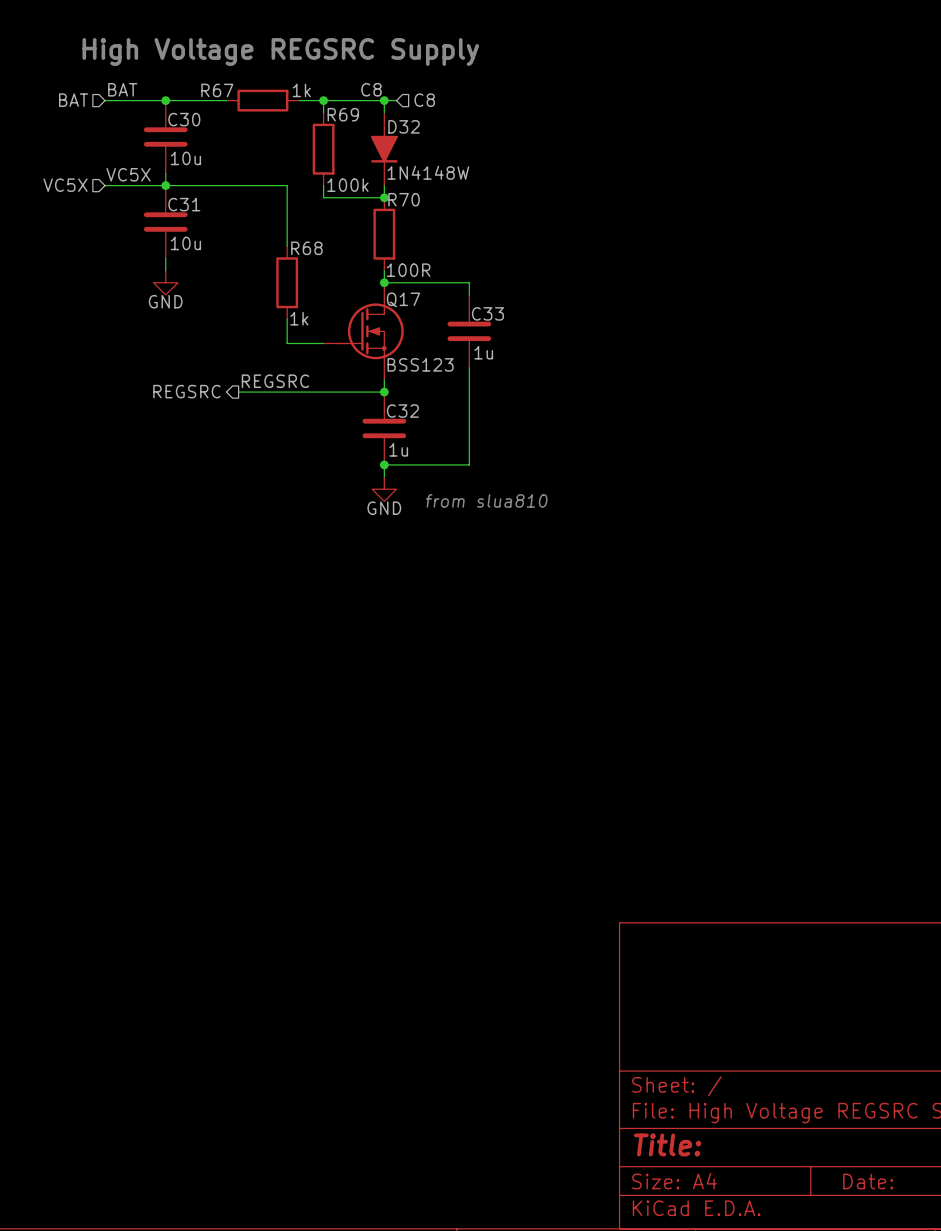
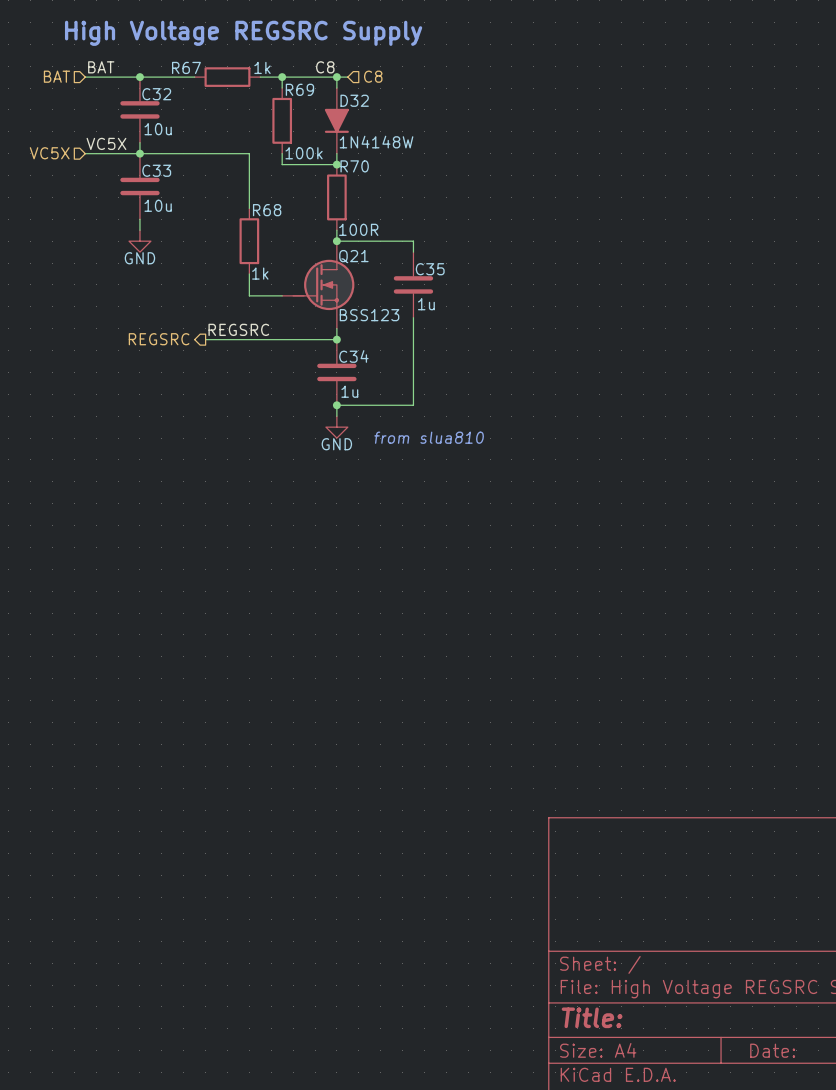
C30 name: C30 (184, 119) -> C32 (156, 94)
C31 name: C31 (184, 204) -> C33 (156, 170)
Q17 name: Q17 (403, 299) -> Q21 (353, 256)
C33 name: C33 (487, 313) -> C35 (430, 269)
C32 name: C32 (402, 411) -> C34 (353, 356)

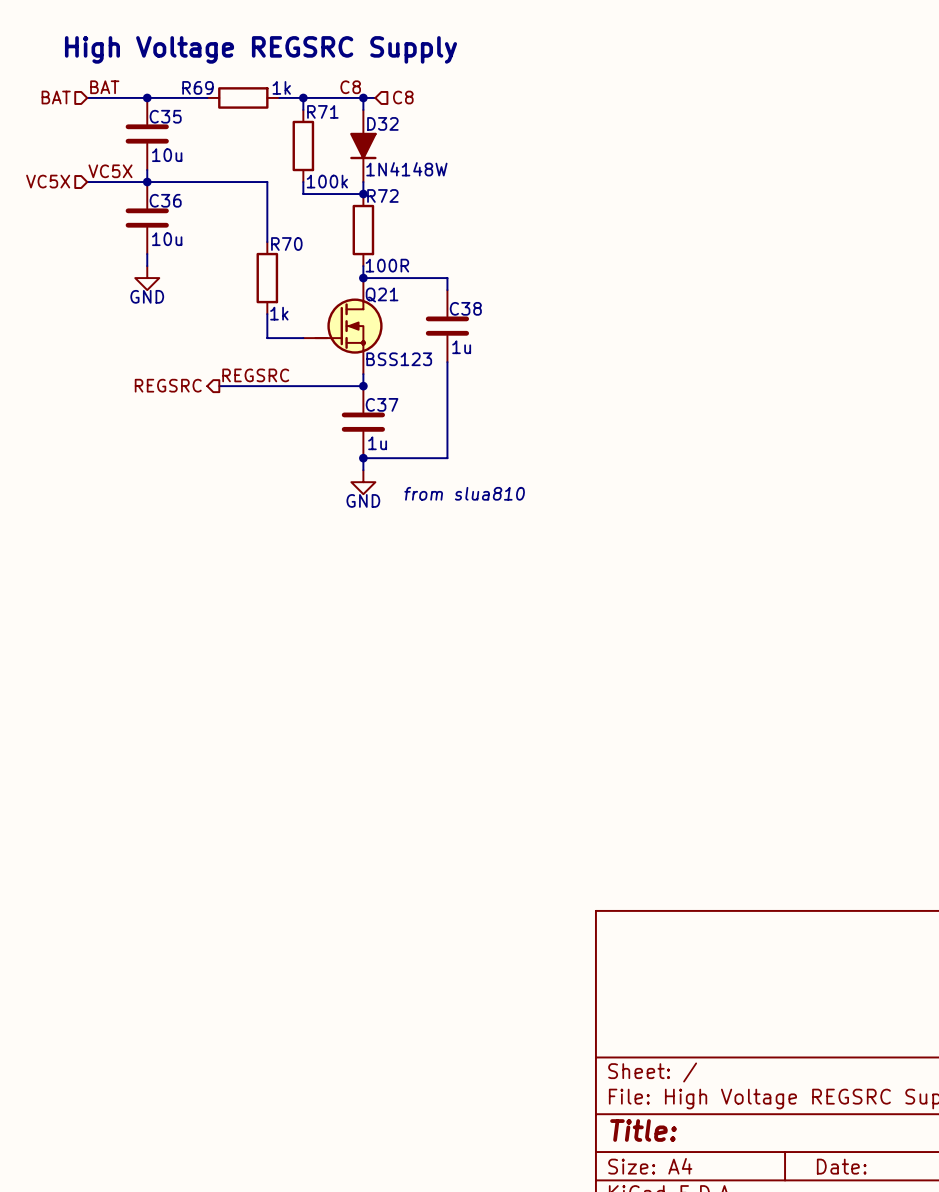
R67 name: R67 (186, 67) -> R69 (197, 87)
R69 name: R69 (299, 89) -> R71 (322, 111)
C32 name: C32 (156, 94) -> C35 (165, 116)
R70 name: R70 (354, 166) -> R72 (382, 195)
C33 name: C33 (156, 170) -> C36 (165, 200)
R68 name: R68 (267, 210) -> R70 (286, 244)
C35 name: C35 (430, 269) -> C38 (465, 308)
C34 name: C34 (353, 356) -> C37 (382, 404)

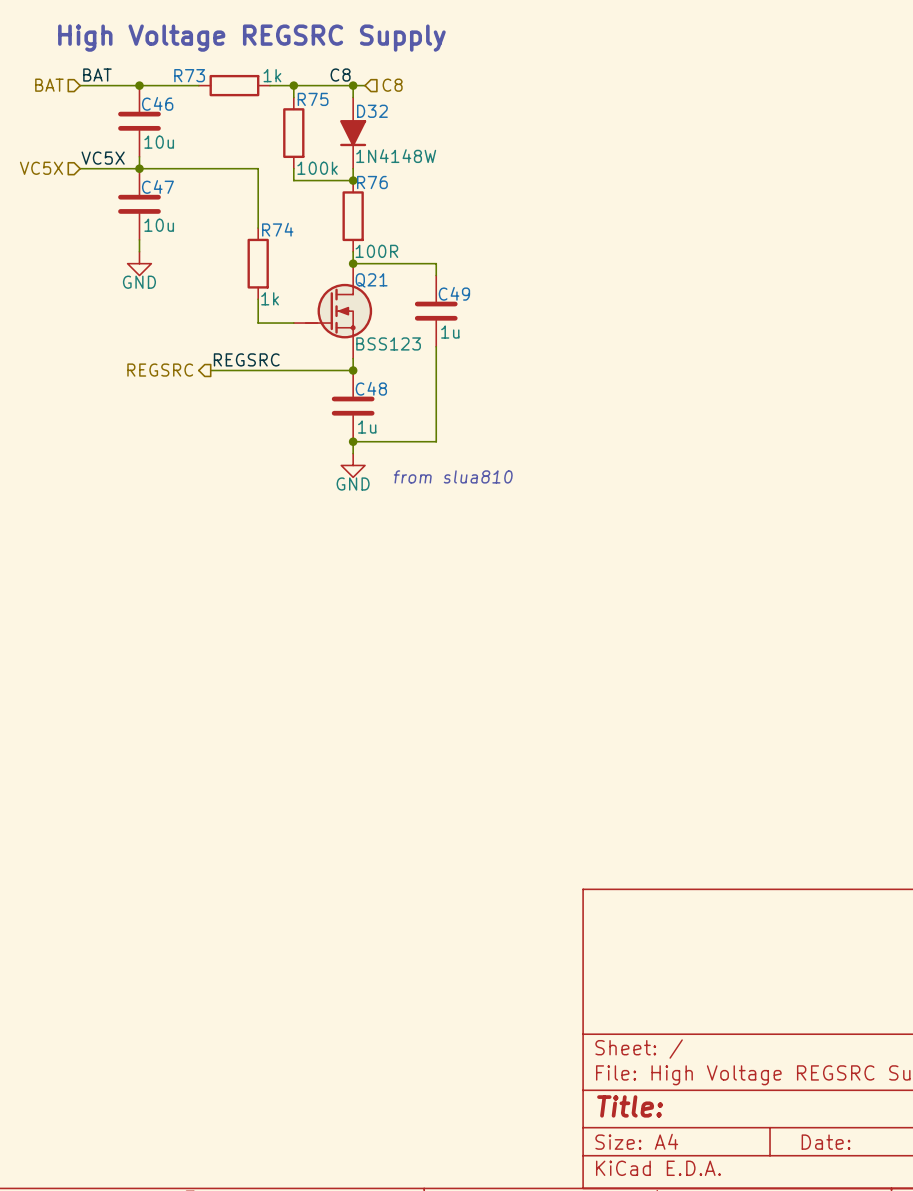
R69 name: R69 (197, 87) -> R73 (189, 75)
R71 name: R71 (322, 111) -> R75 (313, 99)
C35 name: C35 (165, 116) -> C46 (157, 103)
R72 name: R72 (382, 195) -> R76 (372, 182)
C36 name: C36 (165, 200) -> C47 (157, 186)
R70 name: R70 (286, 244) -> R74 (277, 229)
C38 name: C38 (465, 308) -> C49 (454, 293)
C37 name: C37 (382, 404) -> C48 (371, 388)

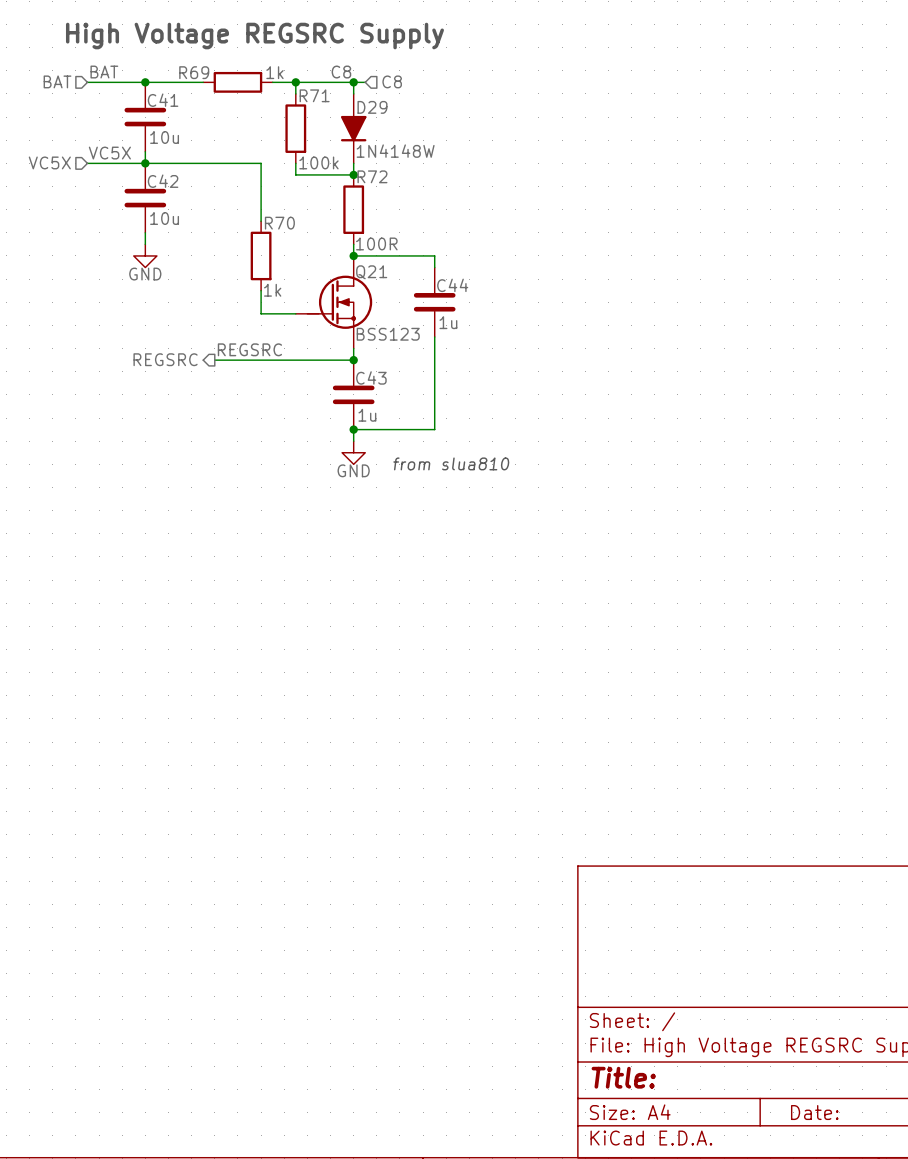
R73 name: R73 (189, 75) -> R69 (194, 72)
R75 name: R75 (313, 99) -> R71 (314, 95)
C46 name: C46 (157, 103) -> C41 (163, 100)
D32 name: D32 (372, 111) -> D29 (372, 107)
R76 name: R76 (372, 182) -> R72 (372, 176)
C47 name: C47 (157, 186) -> C42 (163, 181)
R74 name: R74 (277, 229) -> R70 (279, 223)
C49 name: C49 (454, 293) -> C44 (452, 285)
C48 name: C48 (371, 388) -> C43 (371, 377)

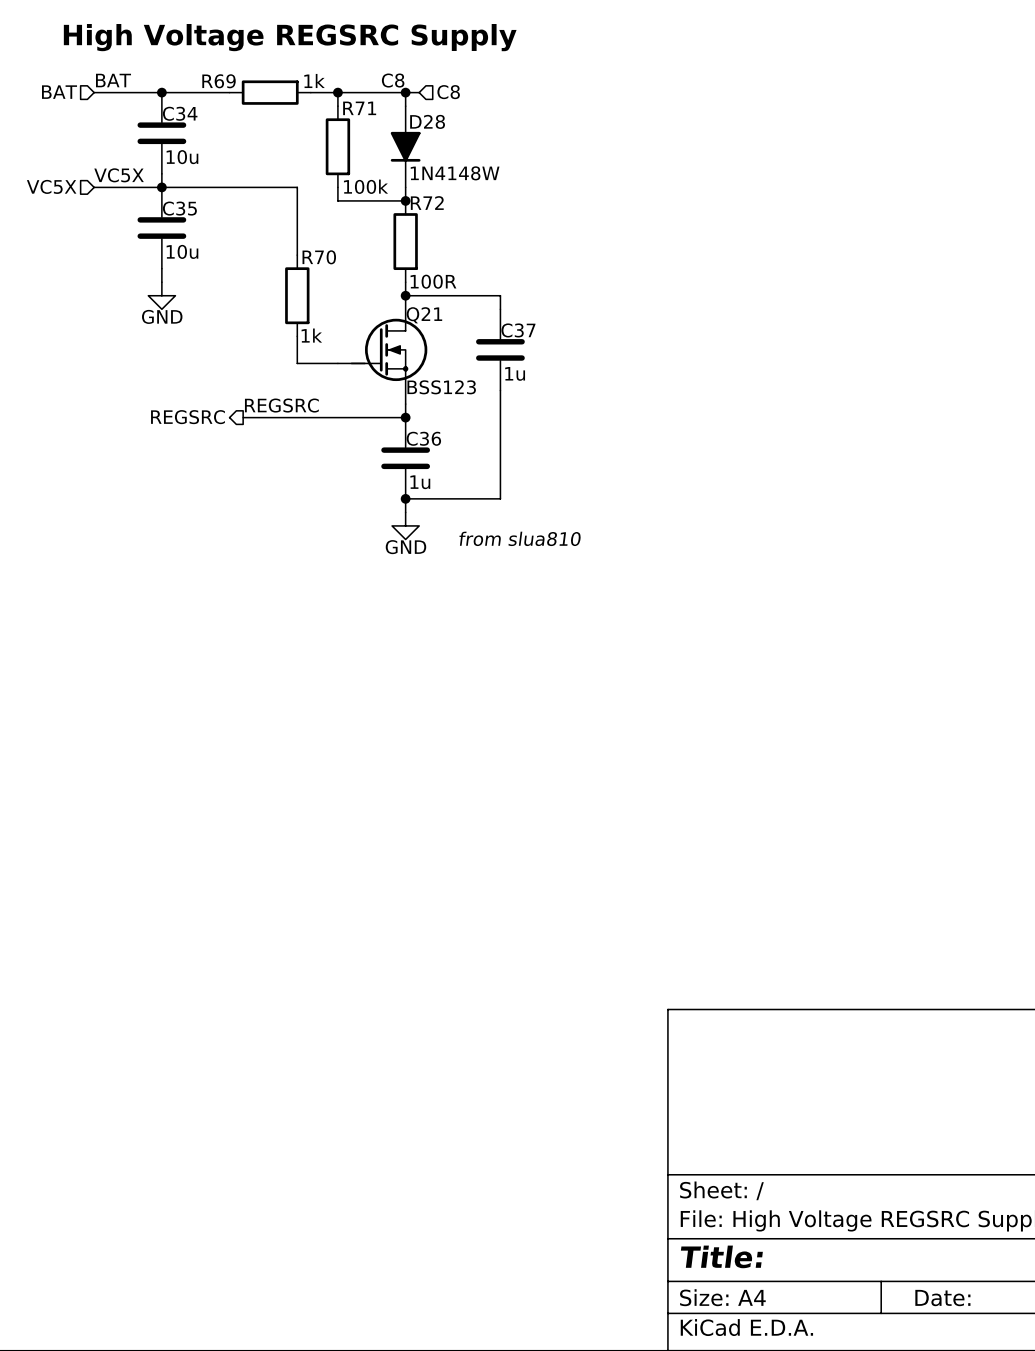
C41 name: C41 (163, 100) -> C34 (180, 113)
D29 name: D29 (372, 107) -> D28 (427, 121)
C42 name: C42 (163, 181) -> C35 (179, 208)
C44 name: C44 (452, 285) -> C37 (518, 330)
C43 name: C43 (371, 377) -> C36 (423, 438)

